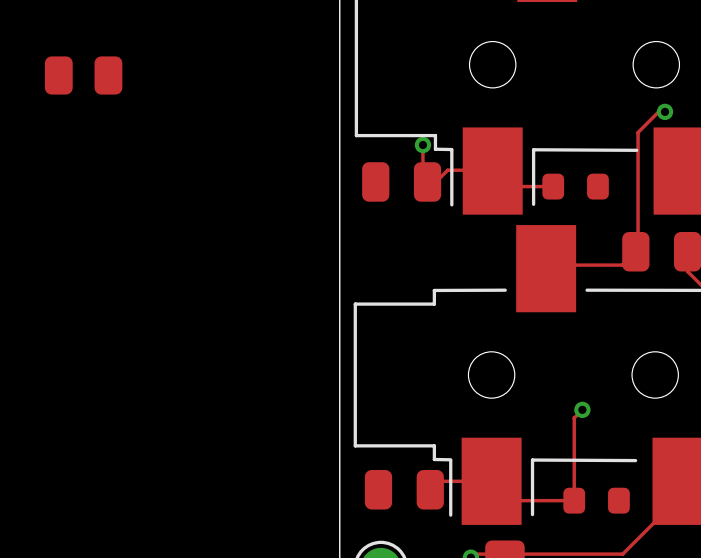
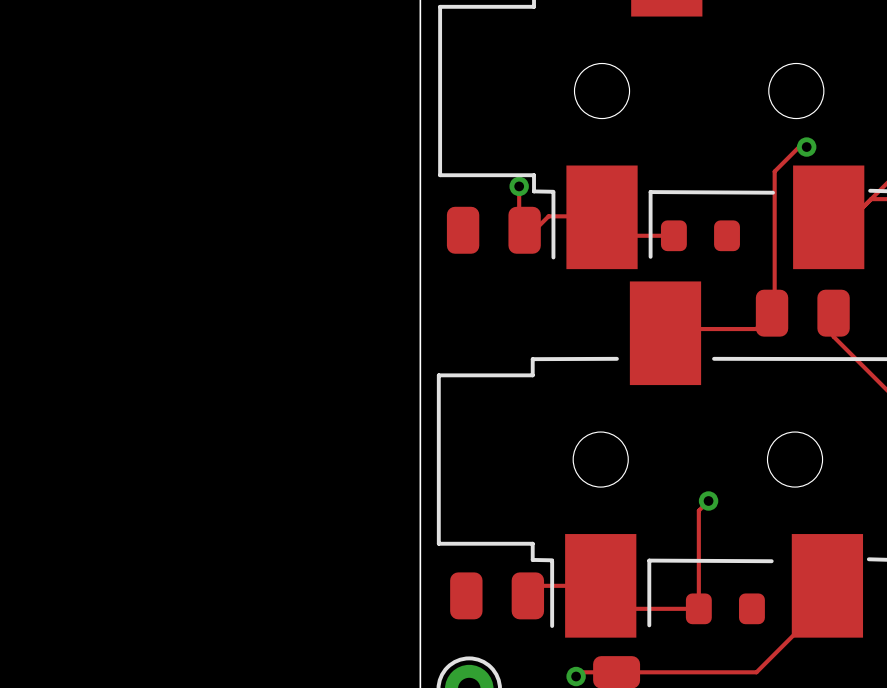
part: (83, 75) -> none

